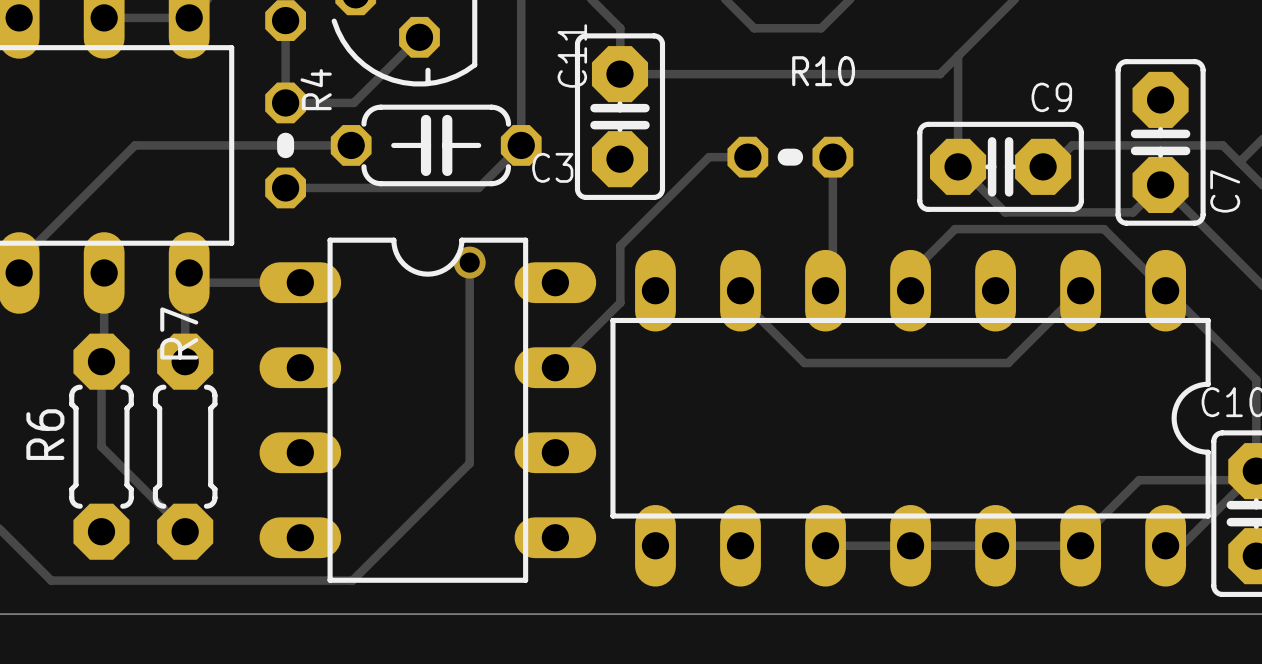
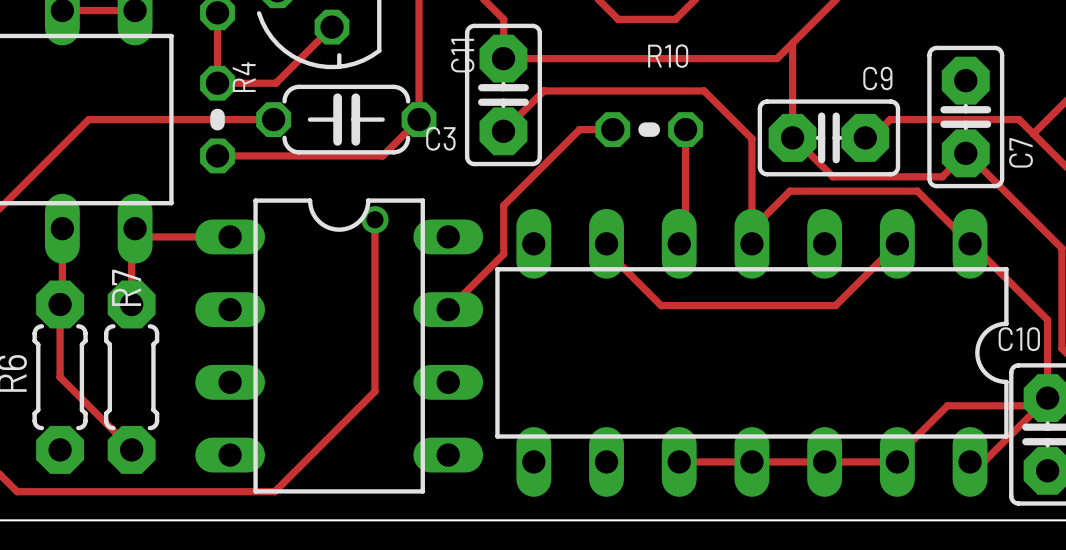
track: none -> (503, 131) (543, 90) (704, 90) (751, 138) (751, 229)

